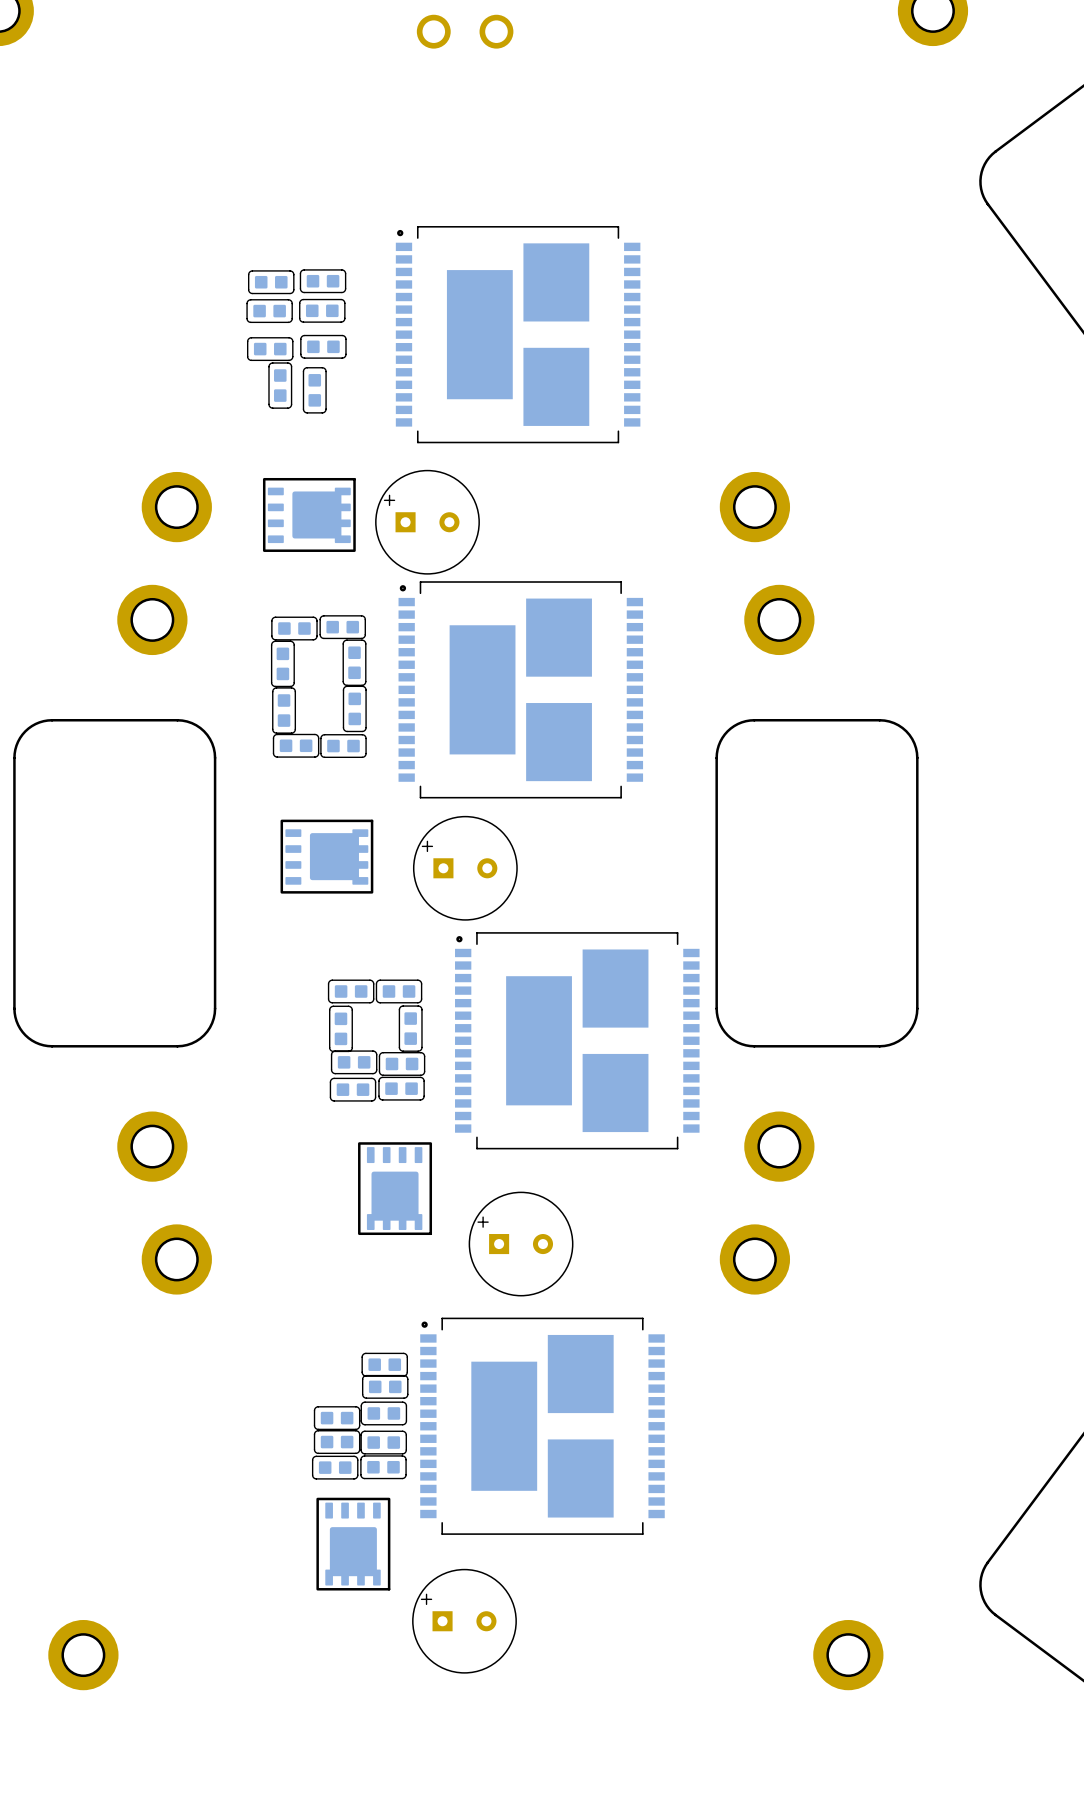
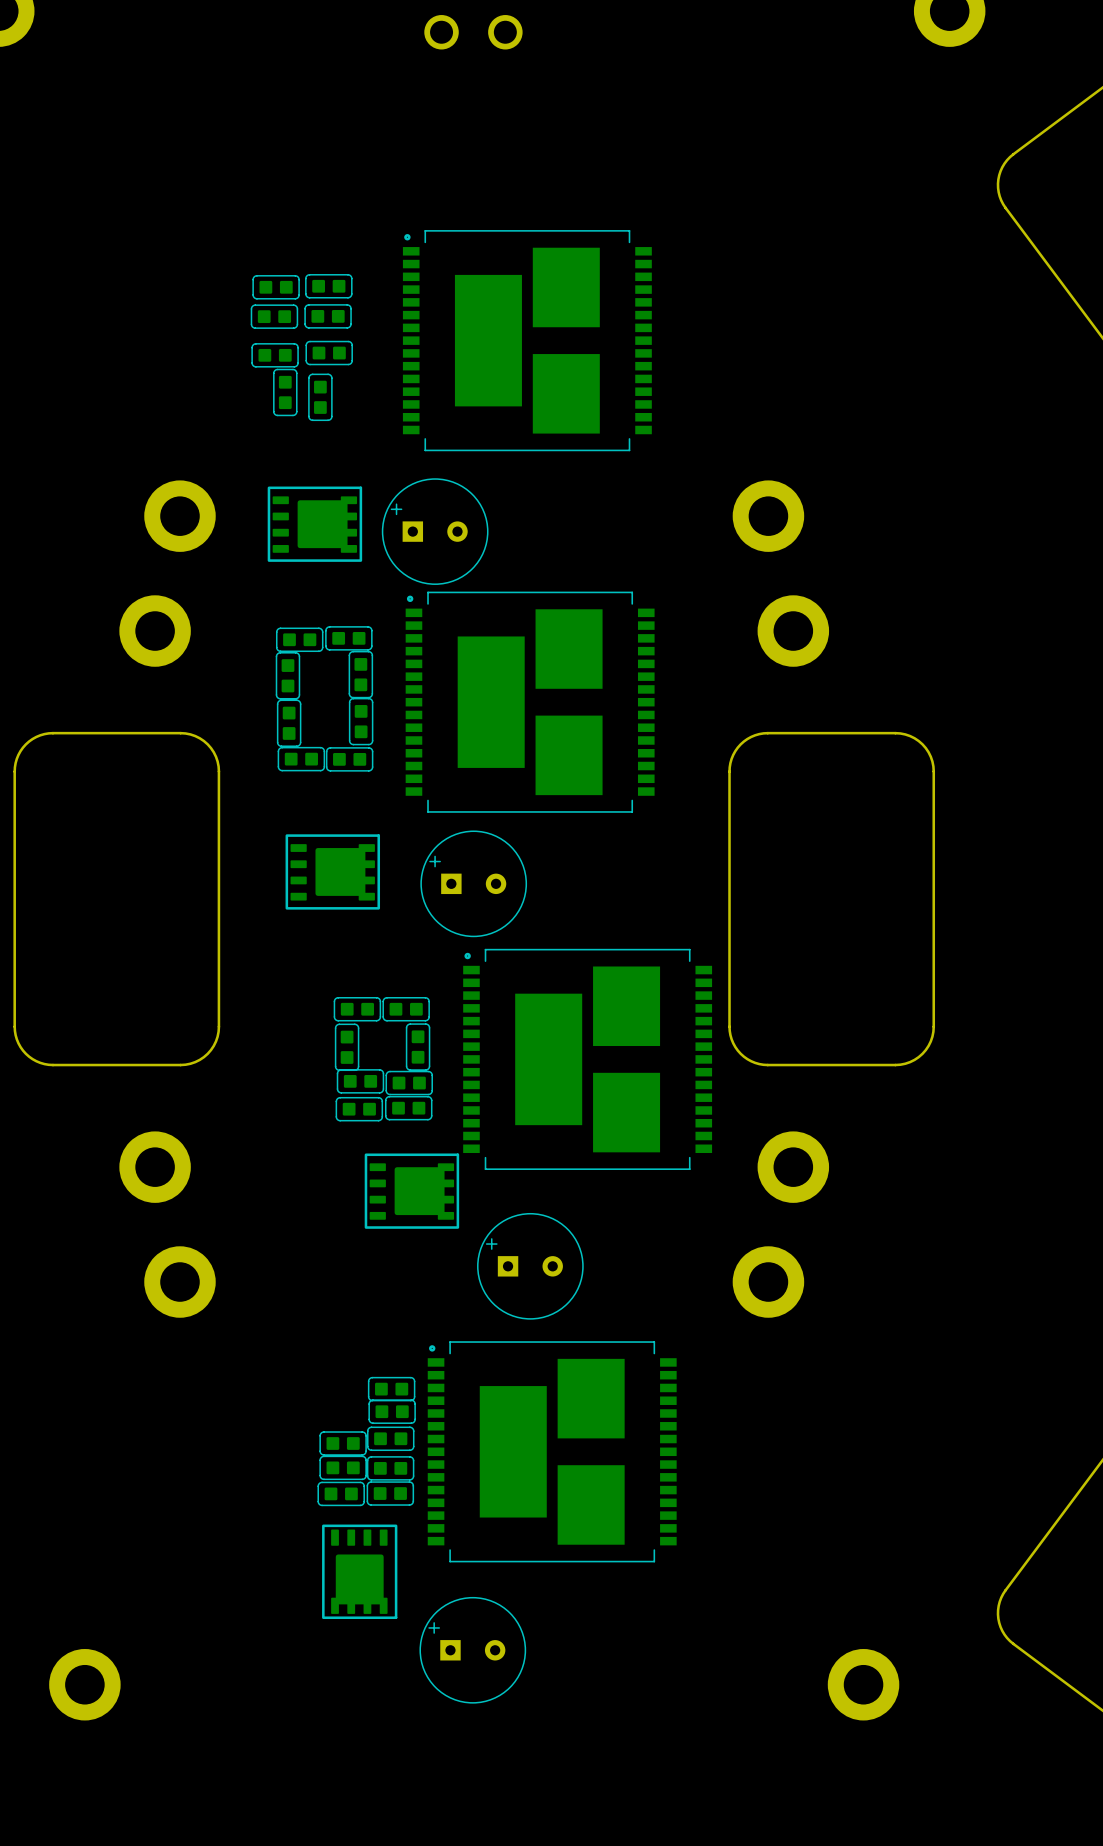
part rotation: 0° (395, 1188) -> 90° counterclockwise (411, 1191)

